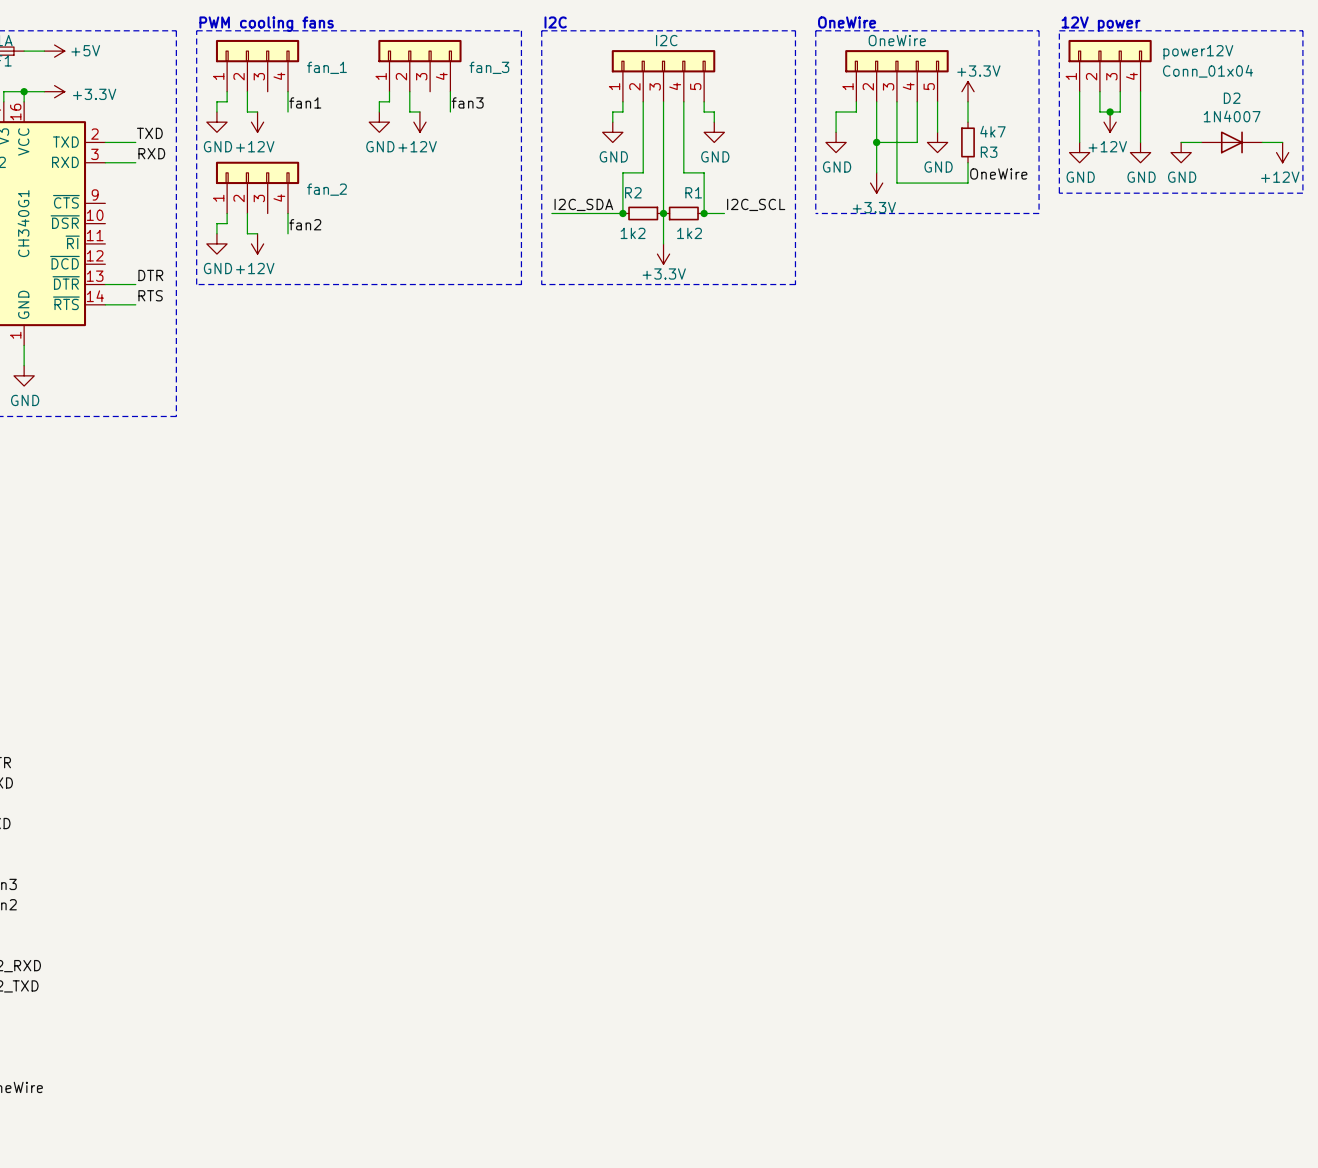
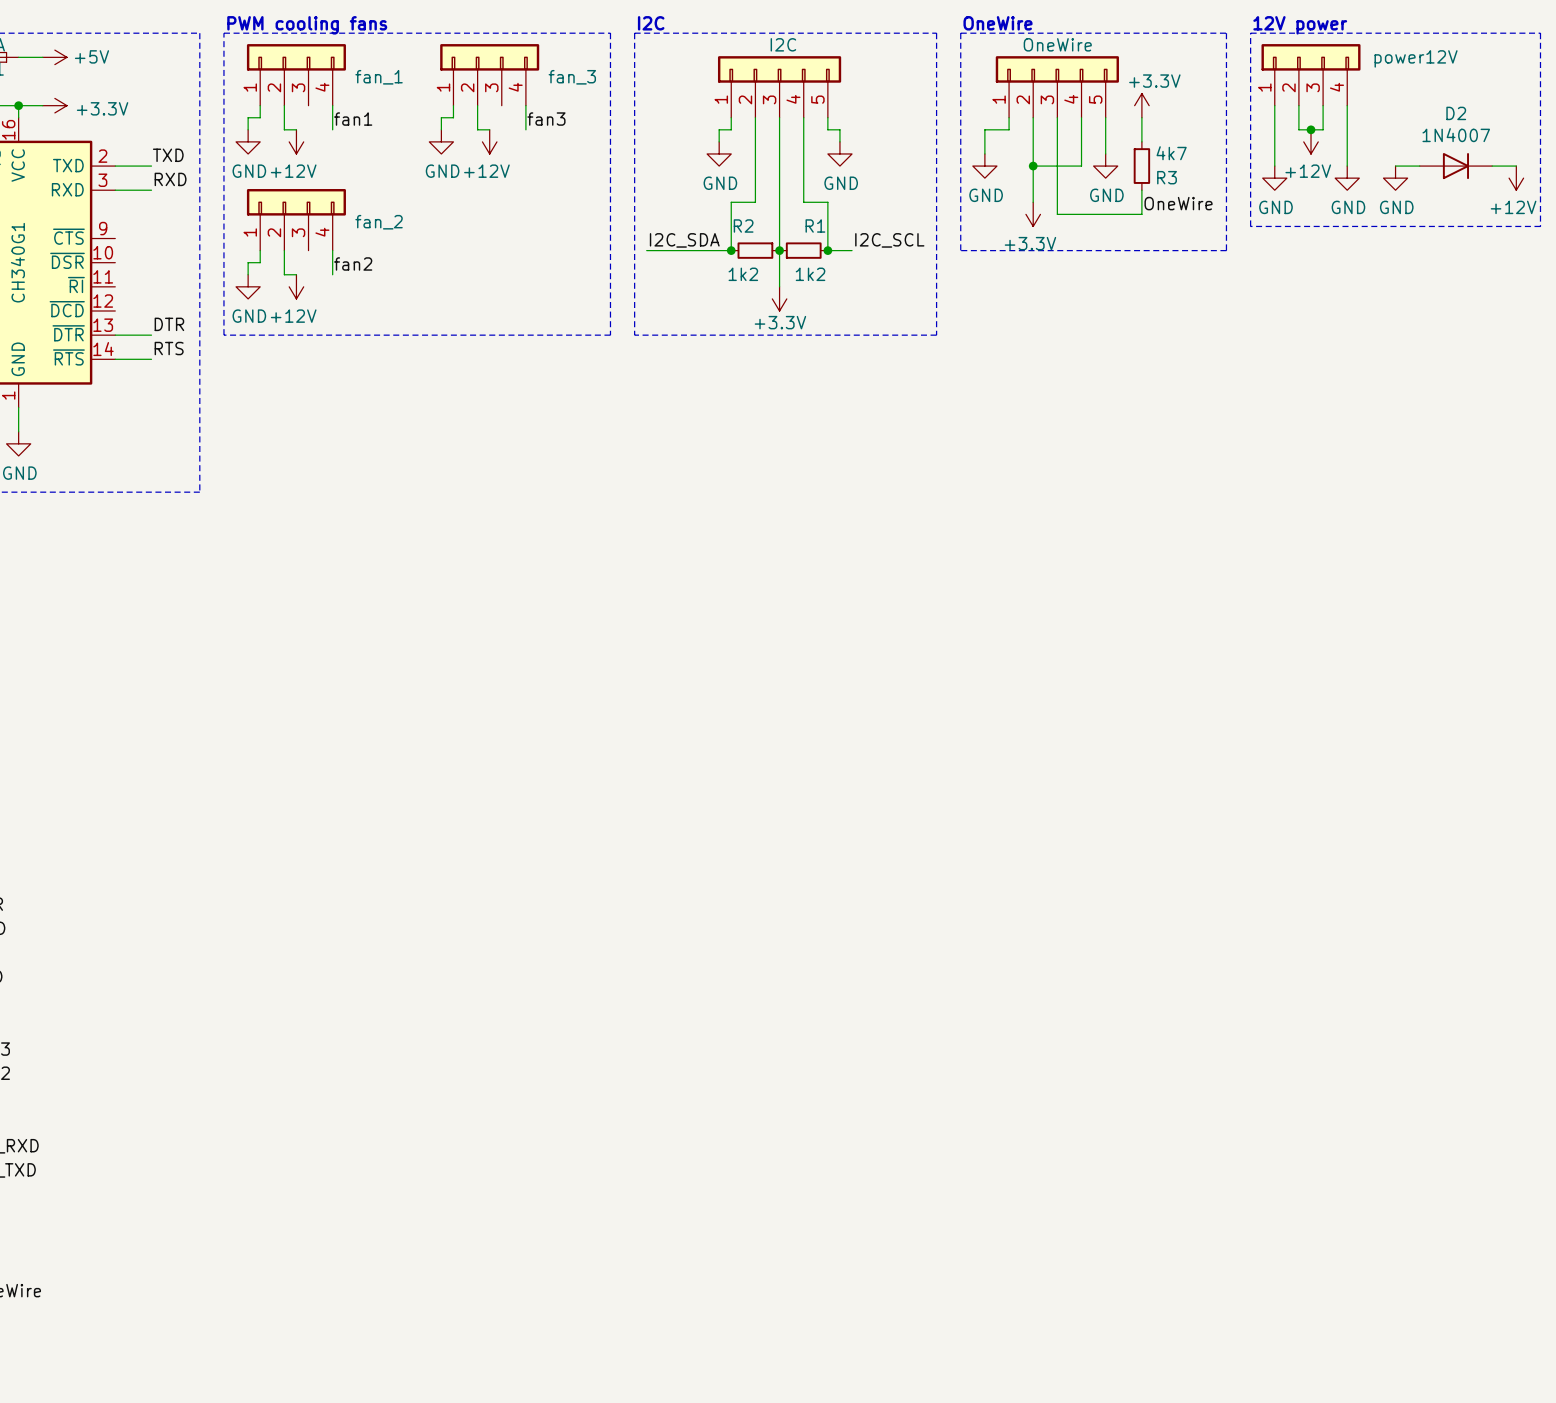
power12V value: Conn_01x04 (1208, 71) -> none

